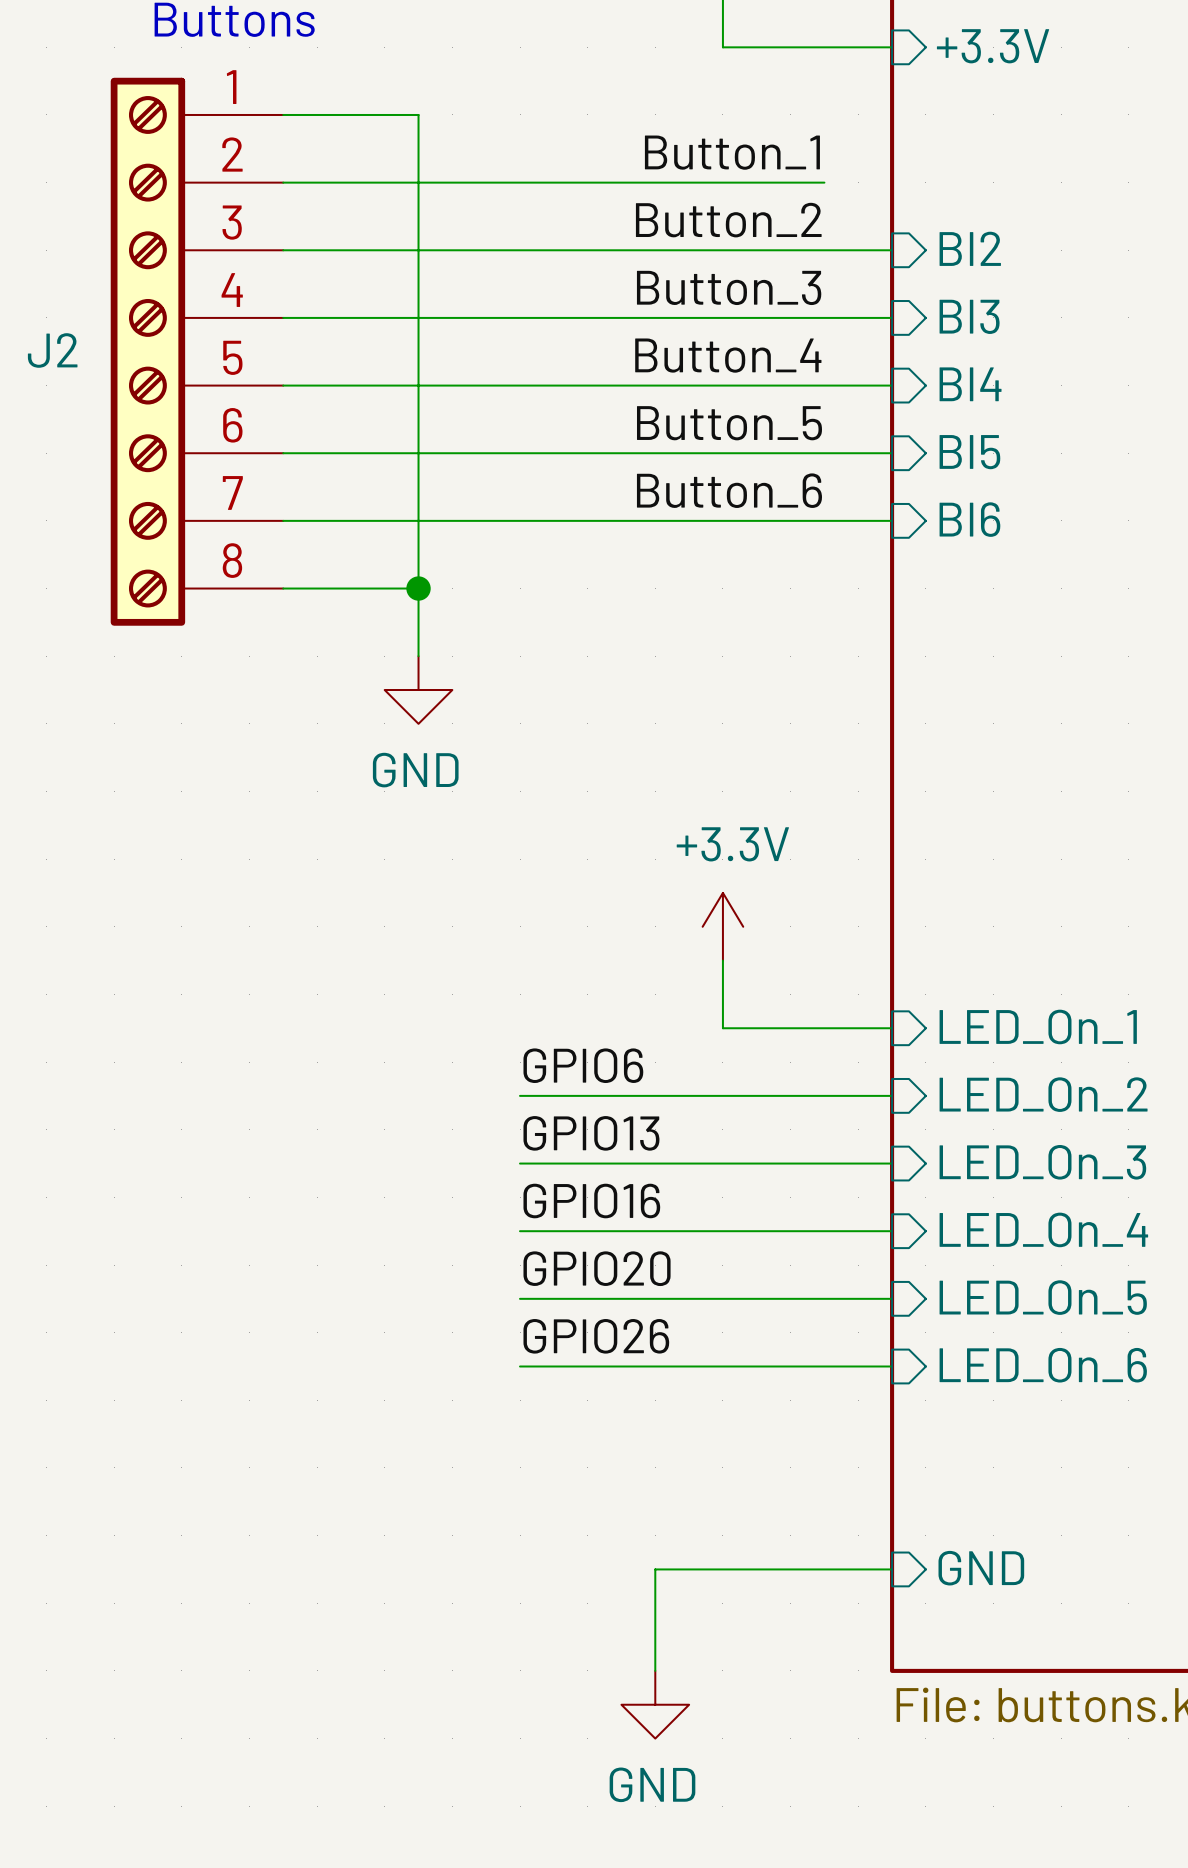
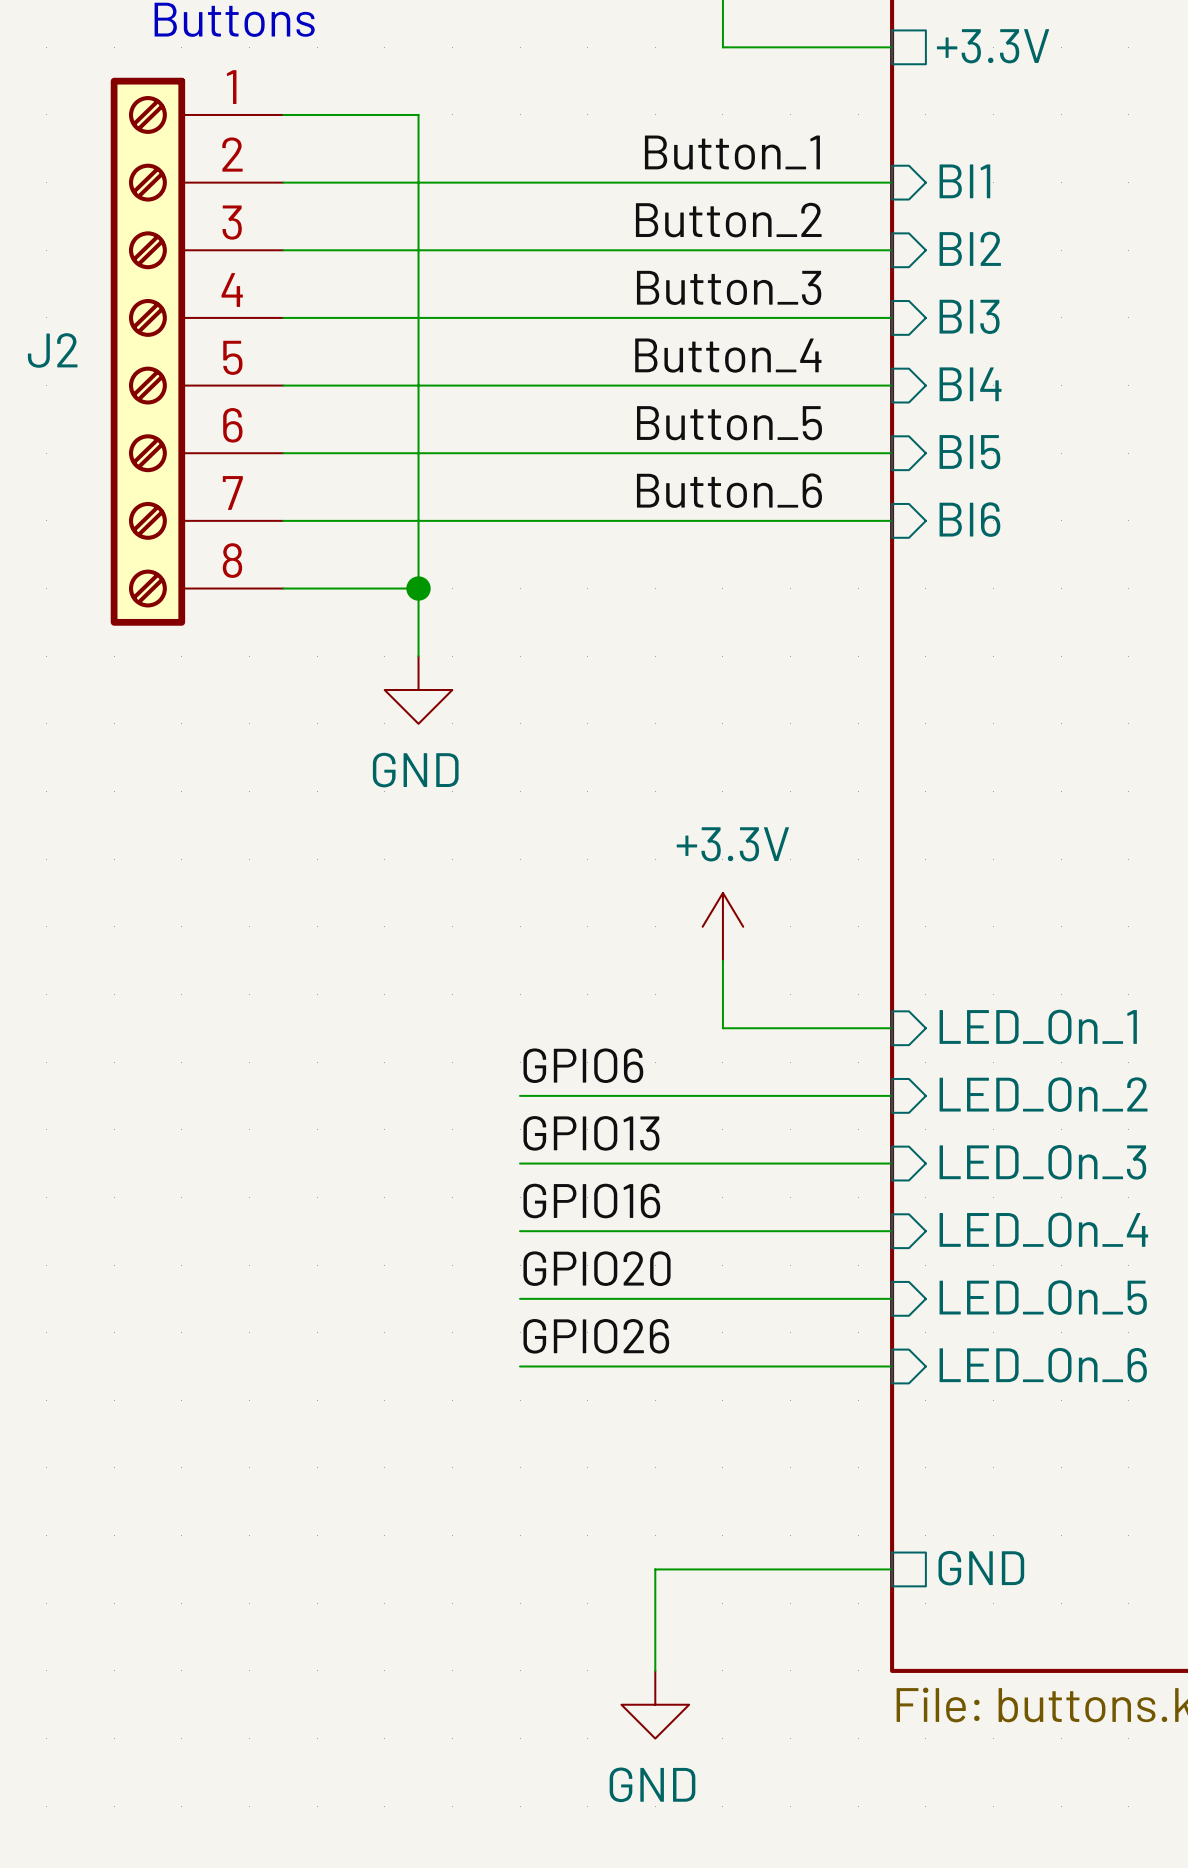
sheet pin shape: input (993, 46) -> passive (993, 46)
sheet pin: none -> BI1 (964, 181)
wire: none -> (824, 182) (892, 182)
sheet pin shape: input (981, 1568) -> passive (981, 1568)

